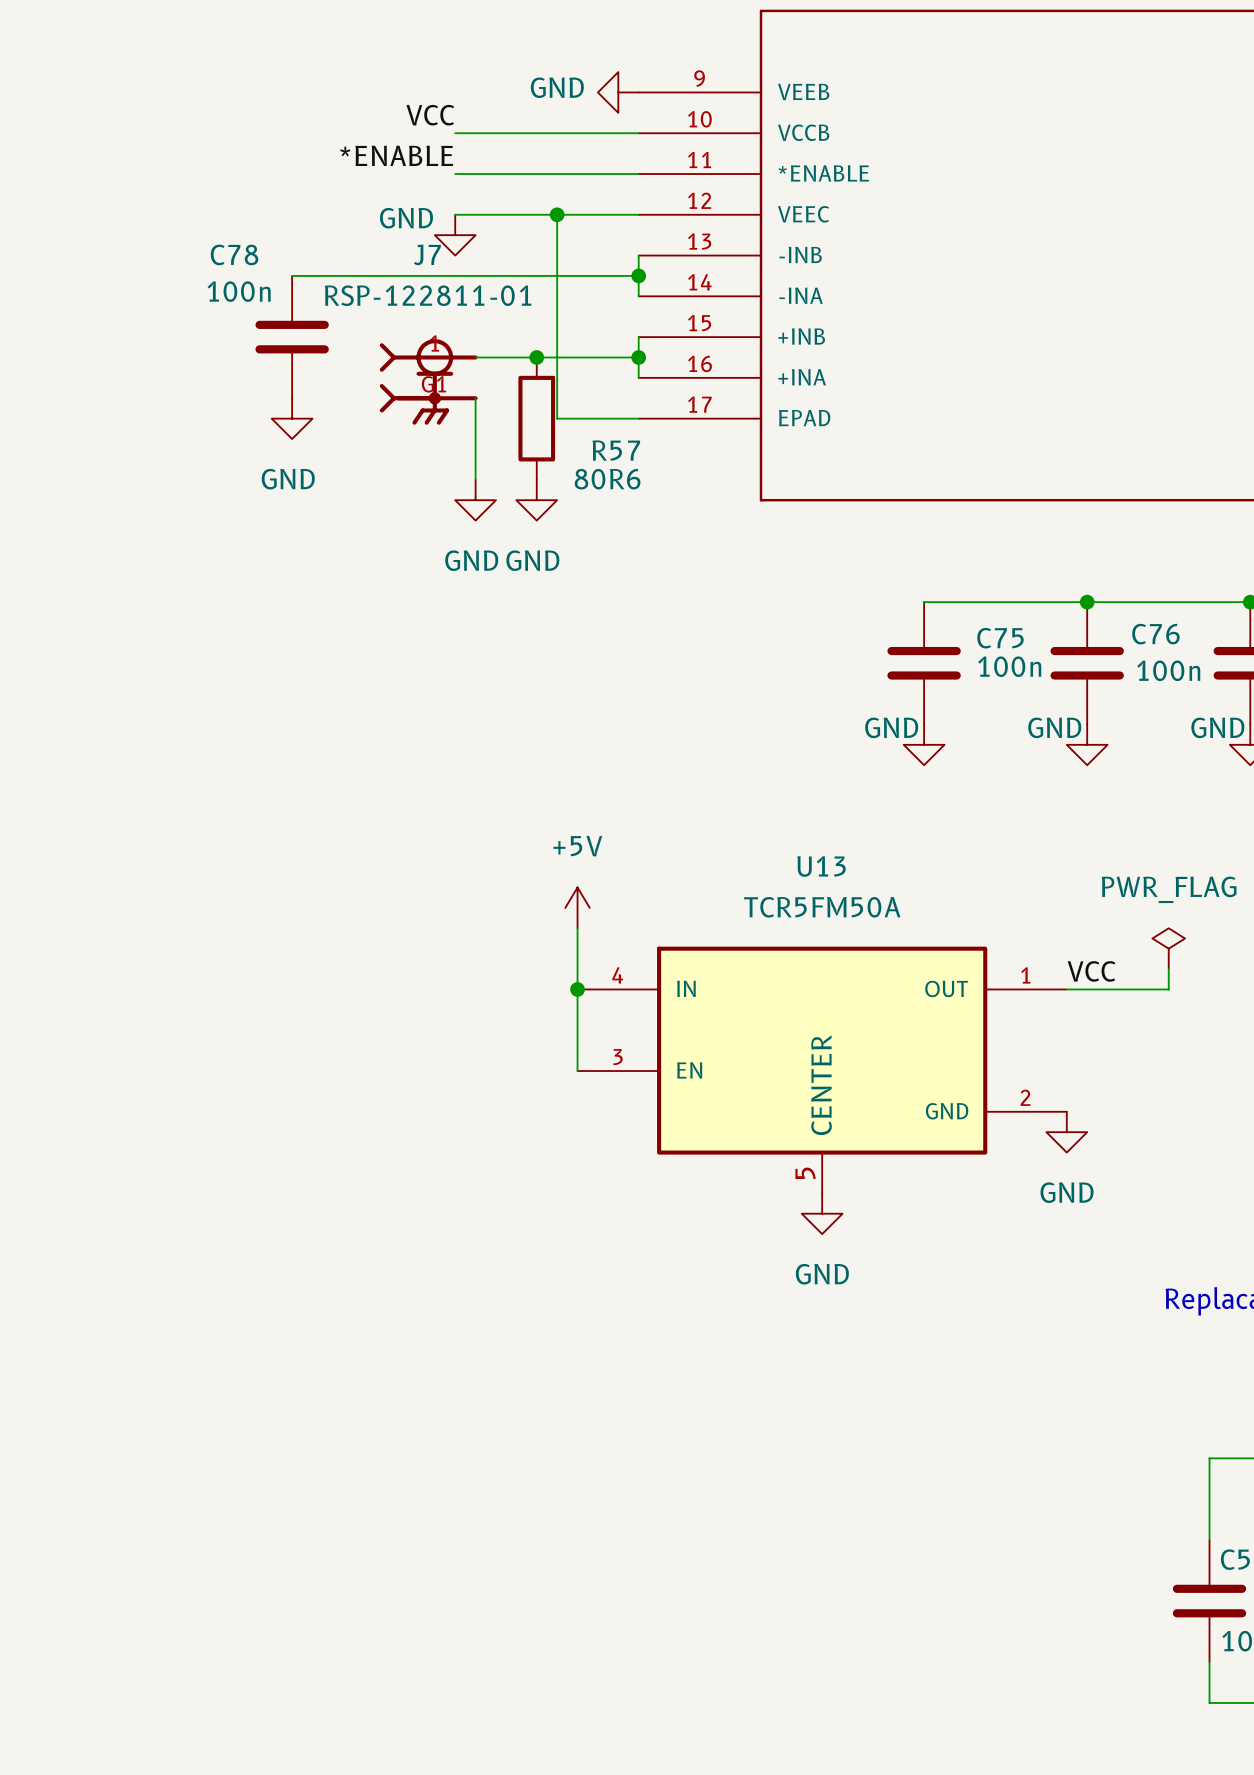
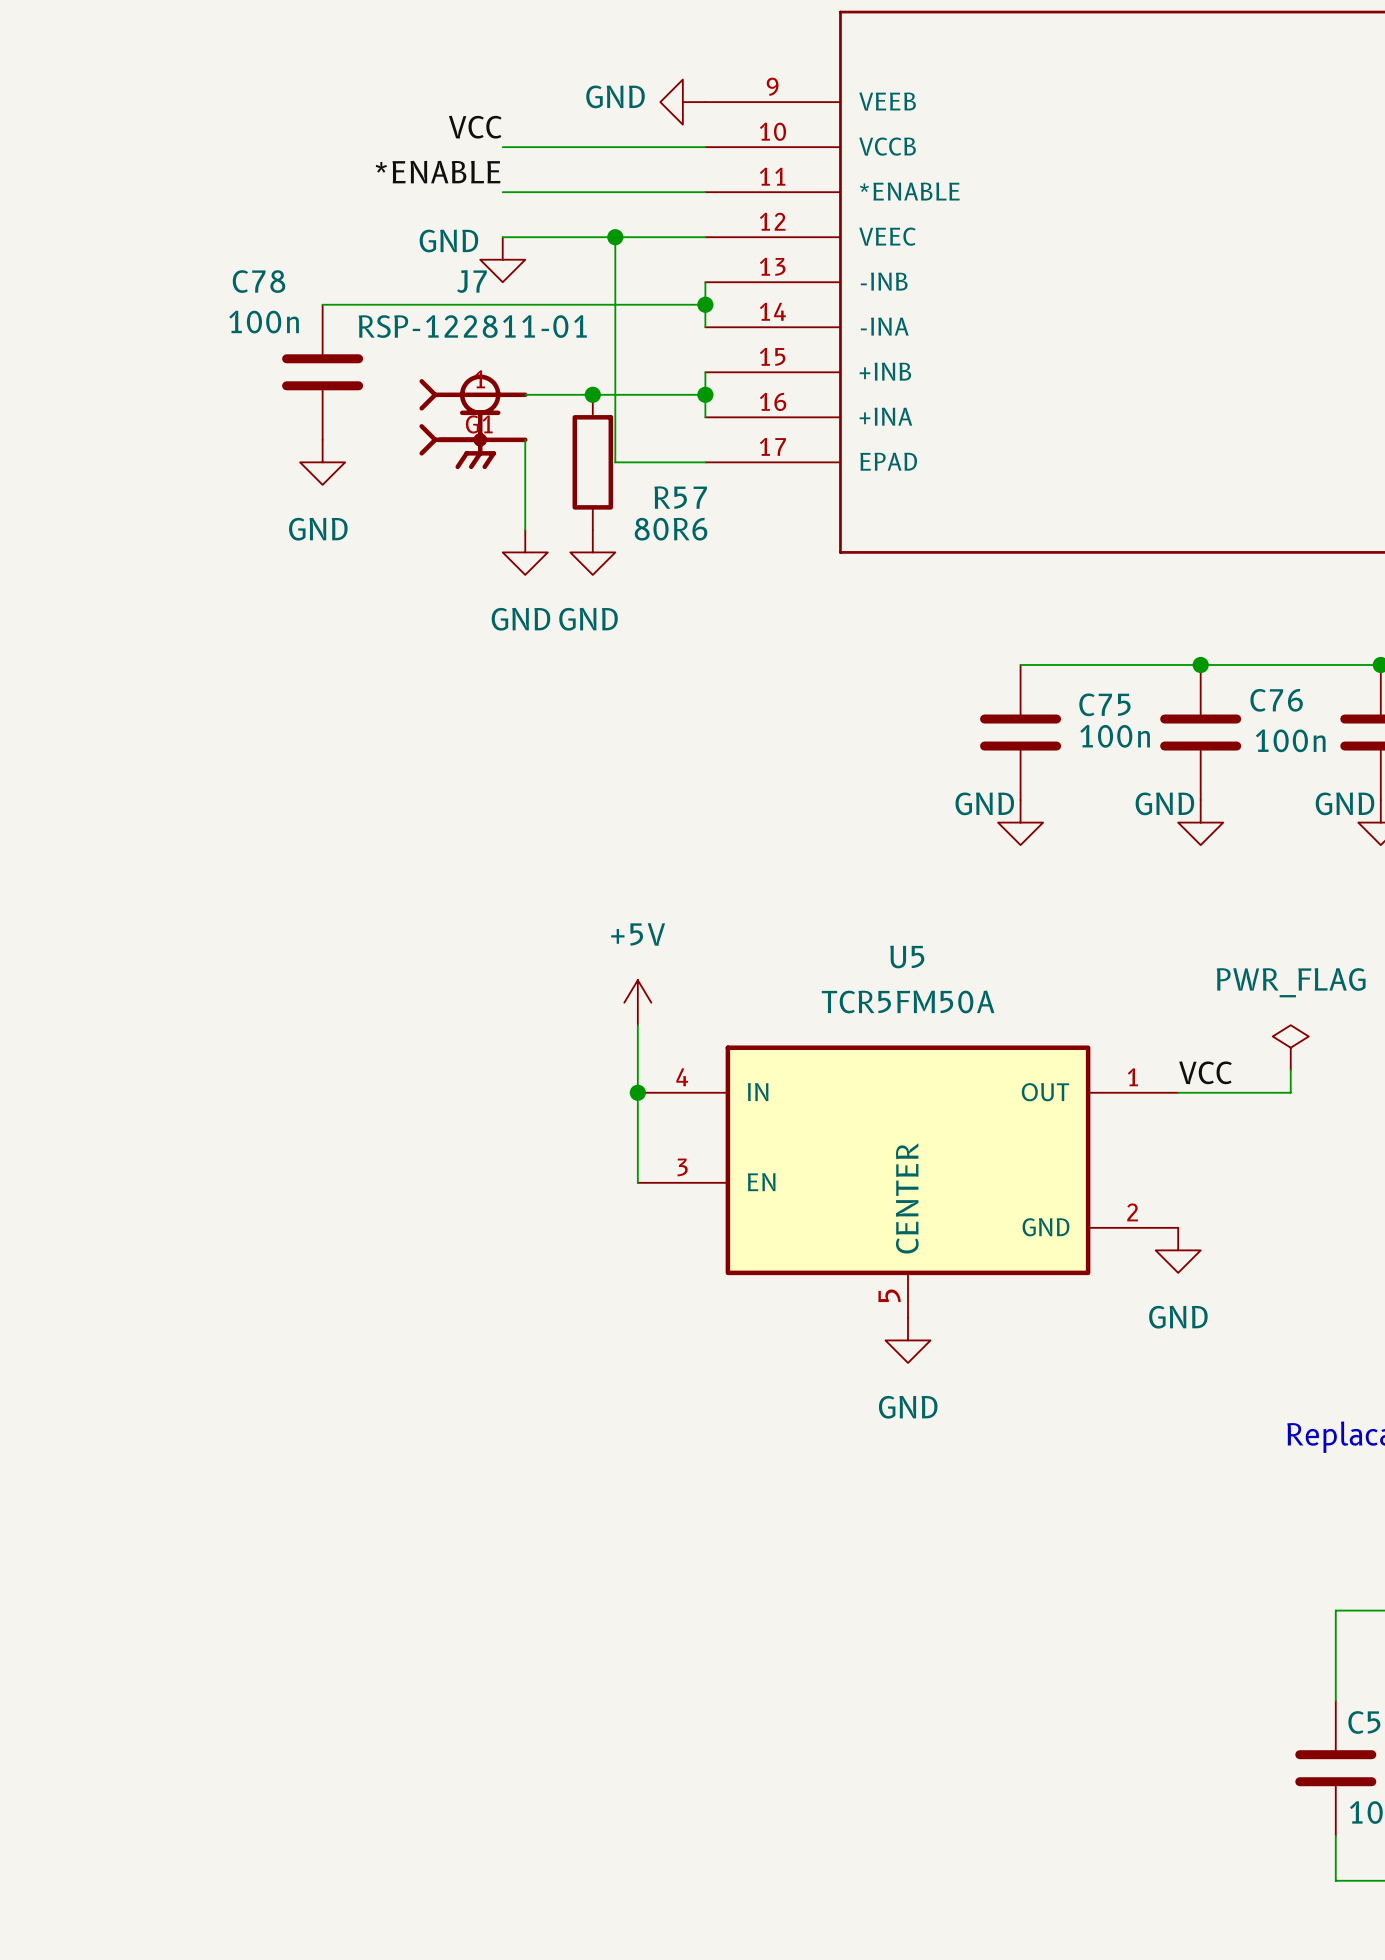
U13 name: U13 (821, 866) -> U5 (907, 956)

